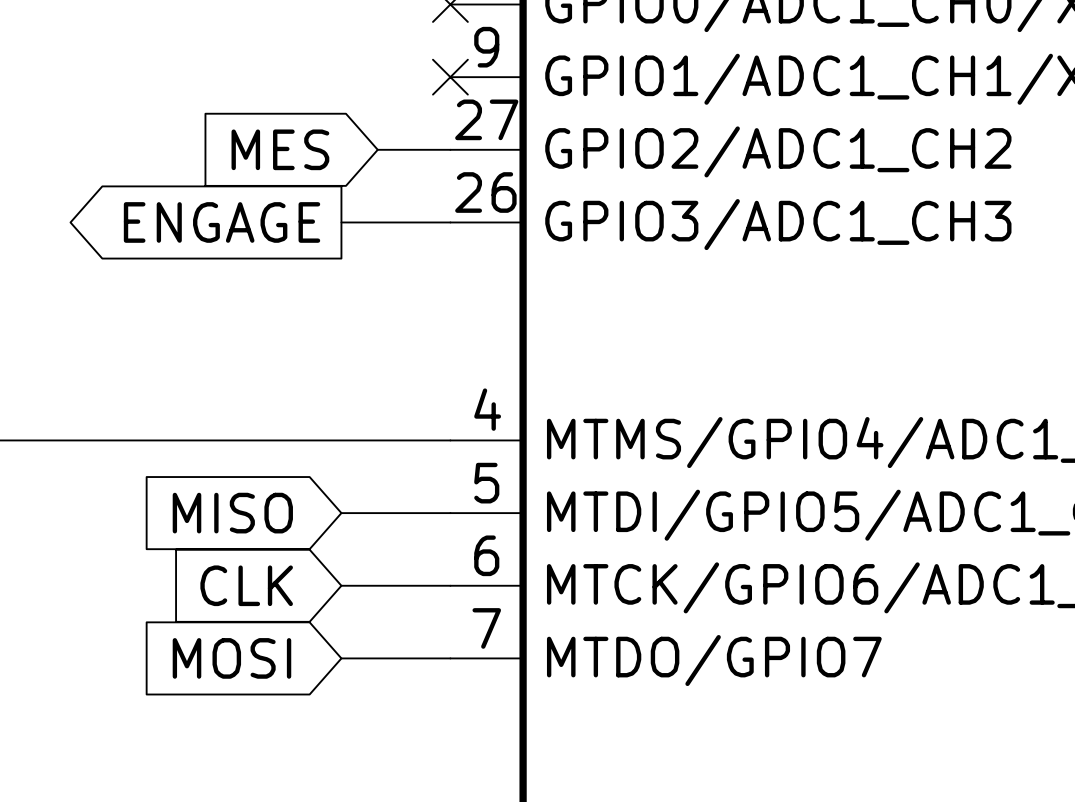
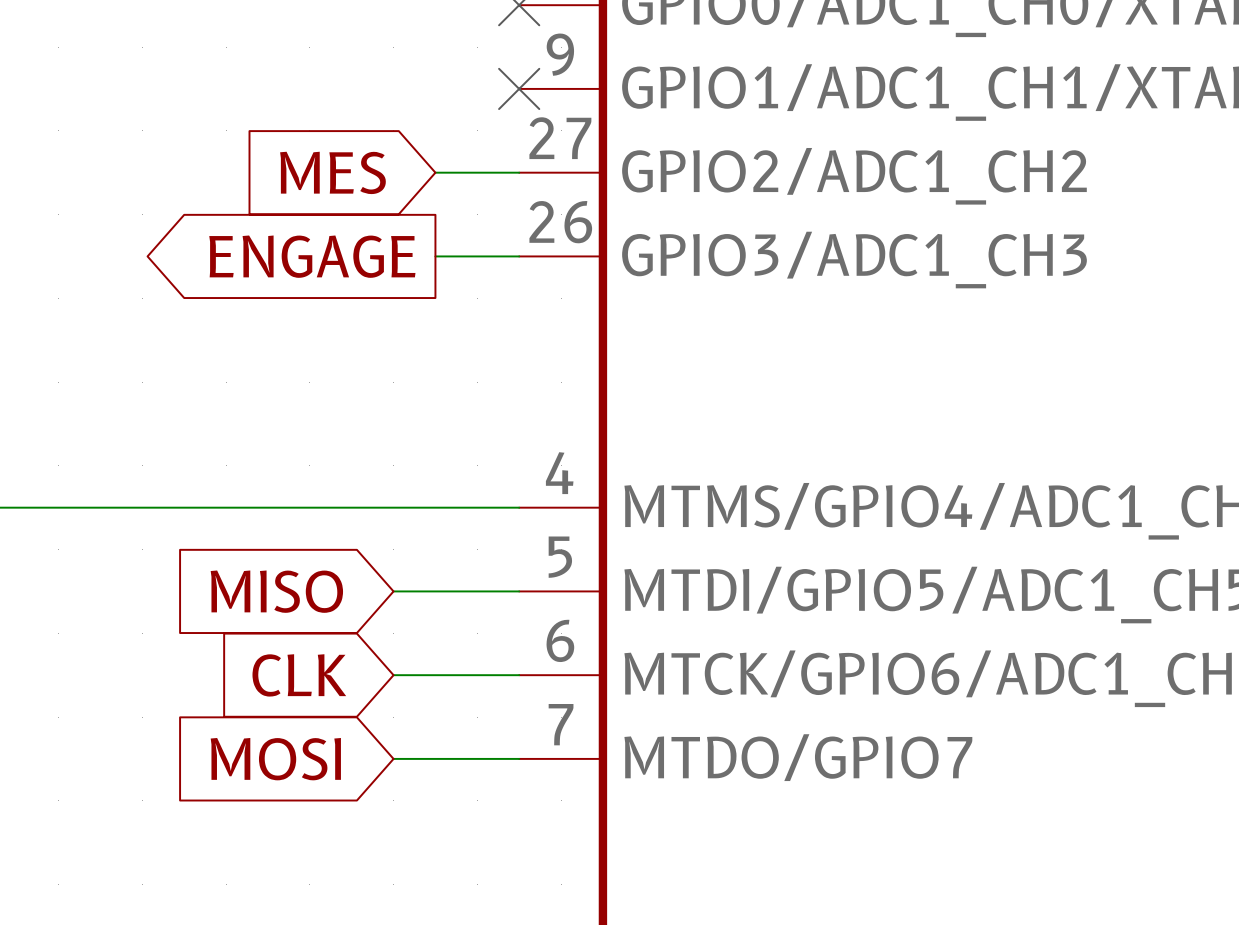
global label position: ENGAGE (222, 222) -> ENGAGE (312, 256)
wire: (341, 222) (377, 222) -> none

